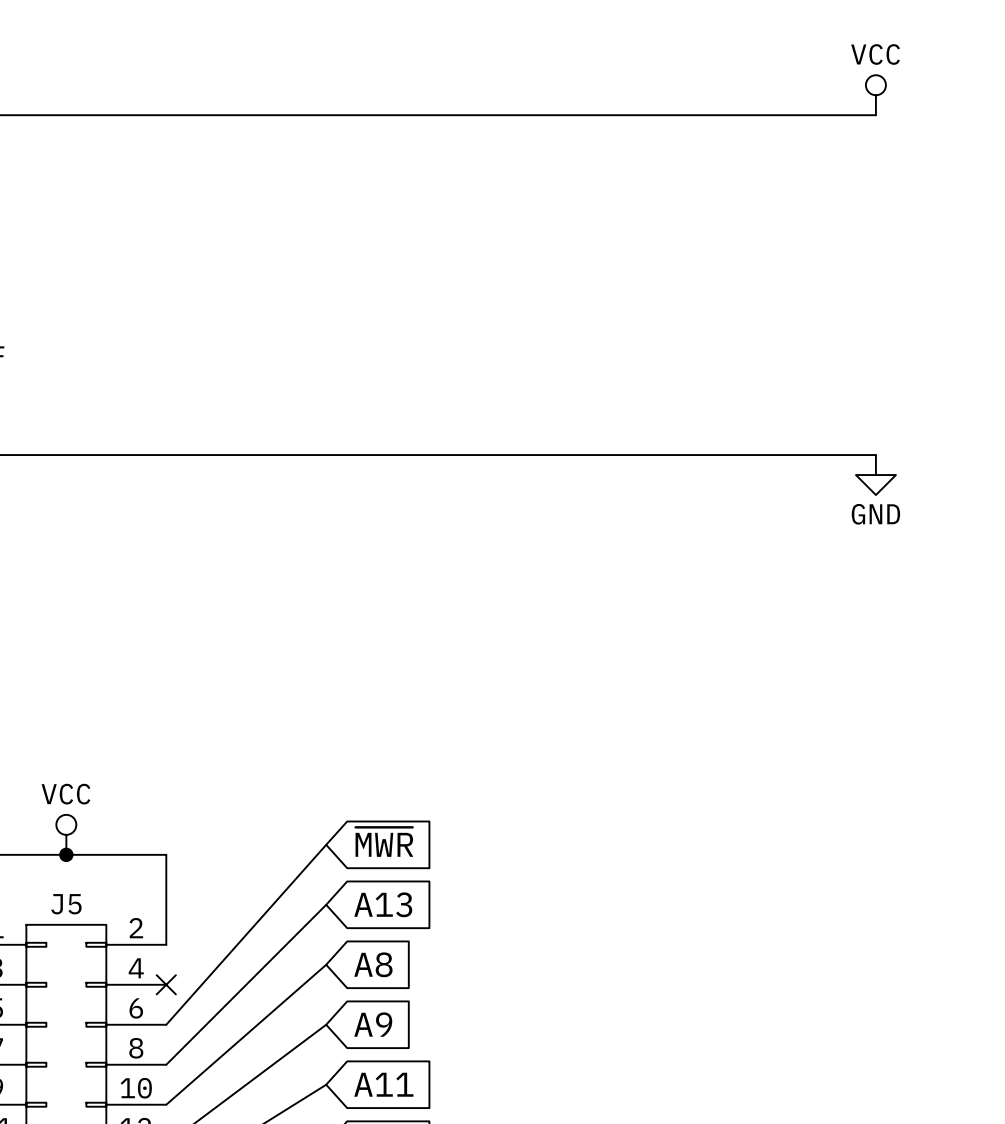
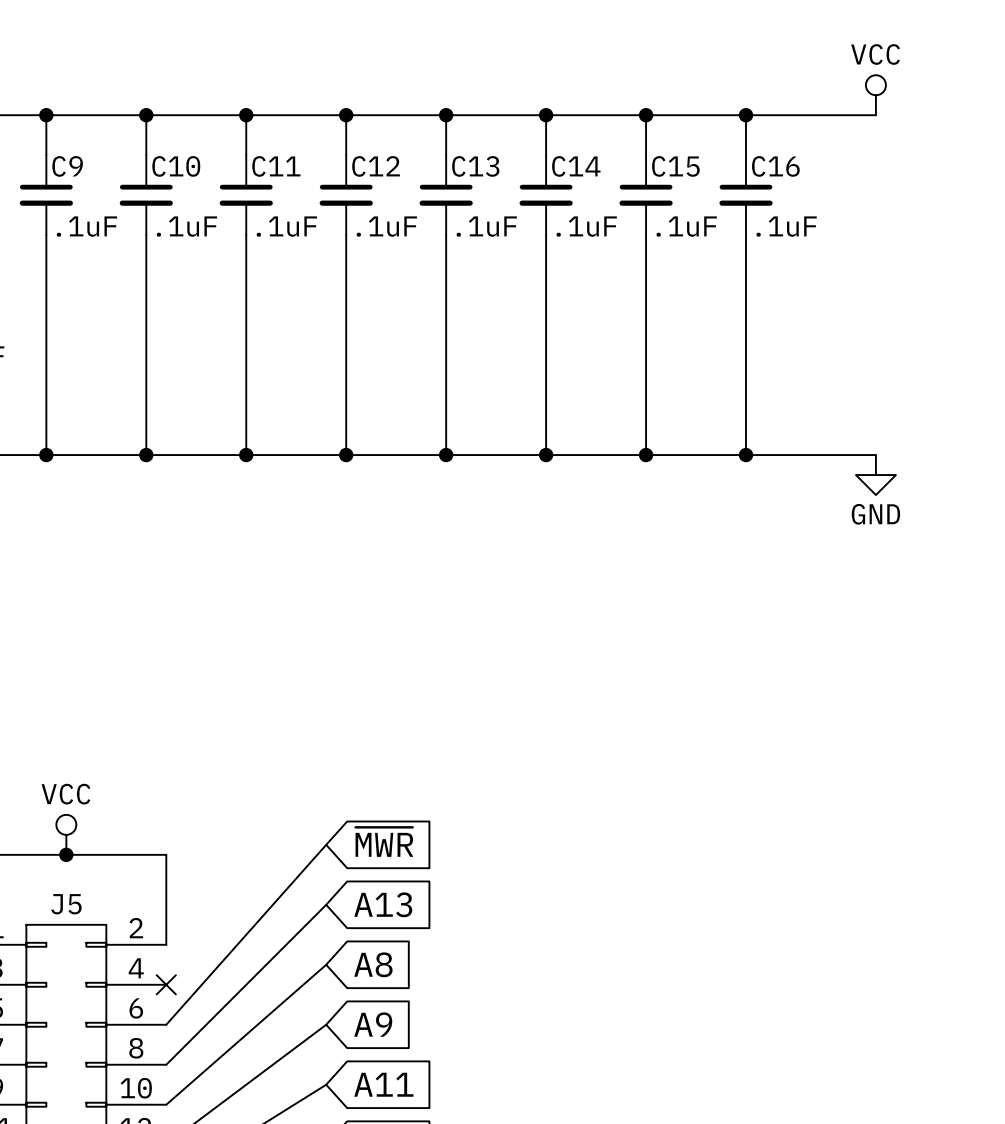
wire: none -> (46, 115) (46, 155)
junction: none -> (46, 115)
wire: none -> (146, 115) (146, 155)
junction: none -> (146, 115)
wire: none -> (246, 115) (246, 155)
junction: none -> (246, 115)
wire: none -> (346, 115) (346, 155)
junction: none -> (346, 115)
wire: none -> (446, 115) (446, 155)
junction: none -> (446, 115)
wire: none -> (546, 115) (546, 155)
junction: none -> (546, 115)
wire: none -> (646, 115) (646, 155)
junction: none -> (646, 115)
wire: none -> (746, 115) (746, 155)
junction: none -> (746, 115)
C9: none -> .1uF (46, 195)
C10: none -> .1uF (146, 195)
C11: none -> .1uF (246, 195)
C12: none -> .1uF (346, 195)
C13: none -> .1uF (446, 195)
C14: none -> .1uF (546, 195)
C15: none -> .1uF (646, 195)
C16: none -> .1uF (746, 195)
wire: none -> (46, 235) (46, 455)
wire: none -> (146, 235) (146, 455)
wire: none -> (246, 235) (246, 455)
wire: none -> (346, 235) (346, 455)
wire: none -> (446, 235) (446, 455)
wire: none -> (546, 235) (546, 455)
wire: none -> (646, 235) (646, 455)
wire: none -> (746, 235) (746, 455)
junction: none -> (46, 455)
junction: none -> (146, 455)
junction: none -> (246, 455)
junction: none -> (346, 455)
junction: none -> (446, 455)
junction: none -> (546, 455)
junction: none -> (646, 455)
junction: none -> (746, 455)

